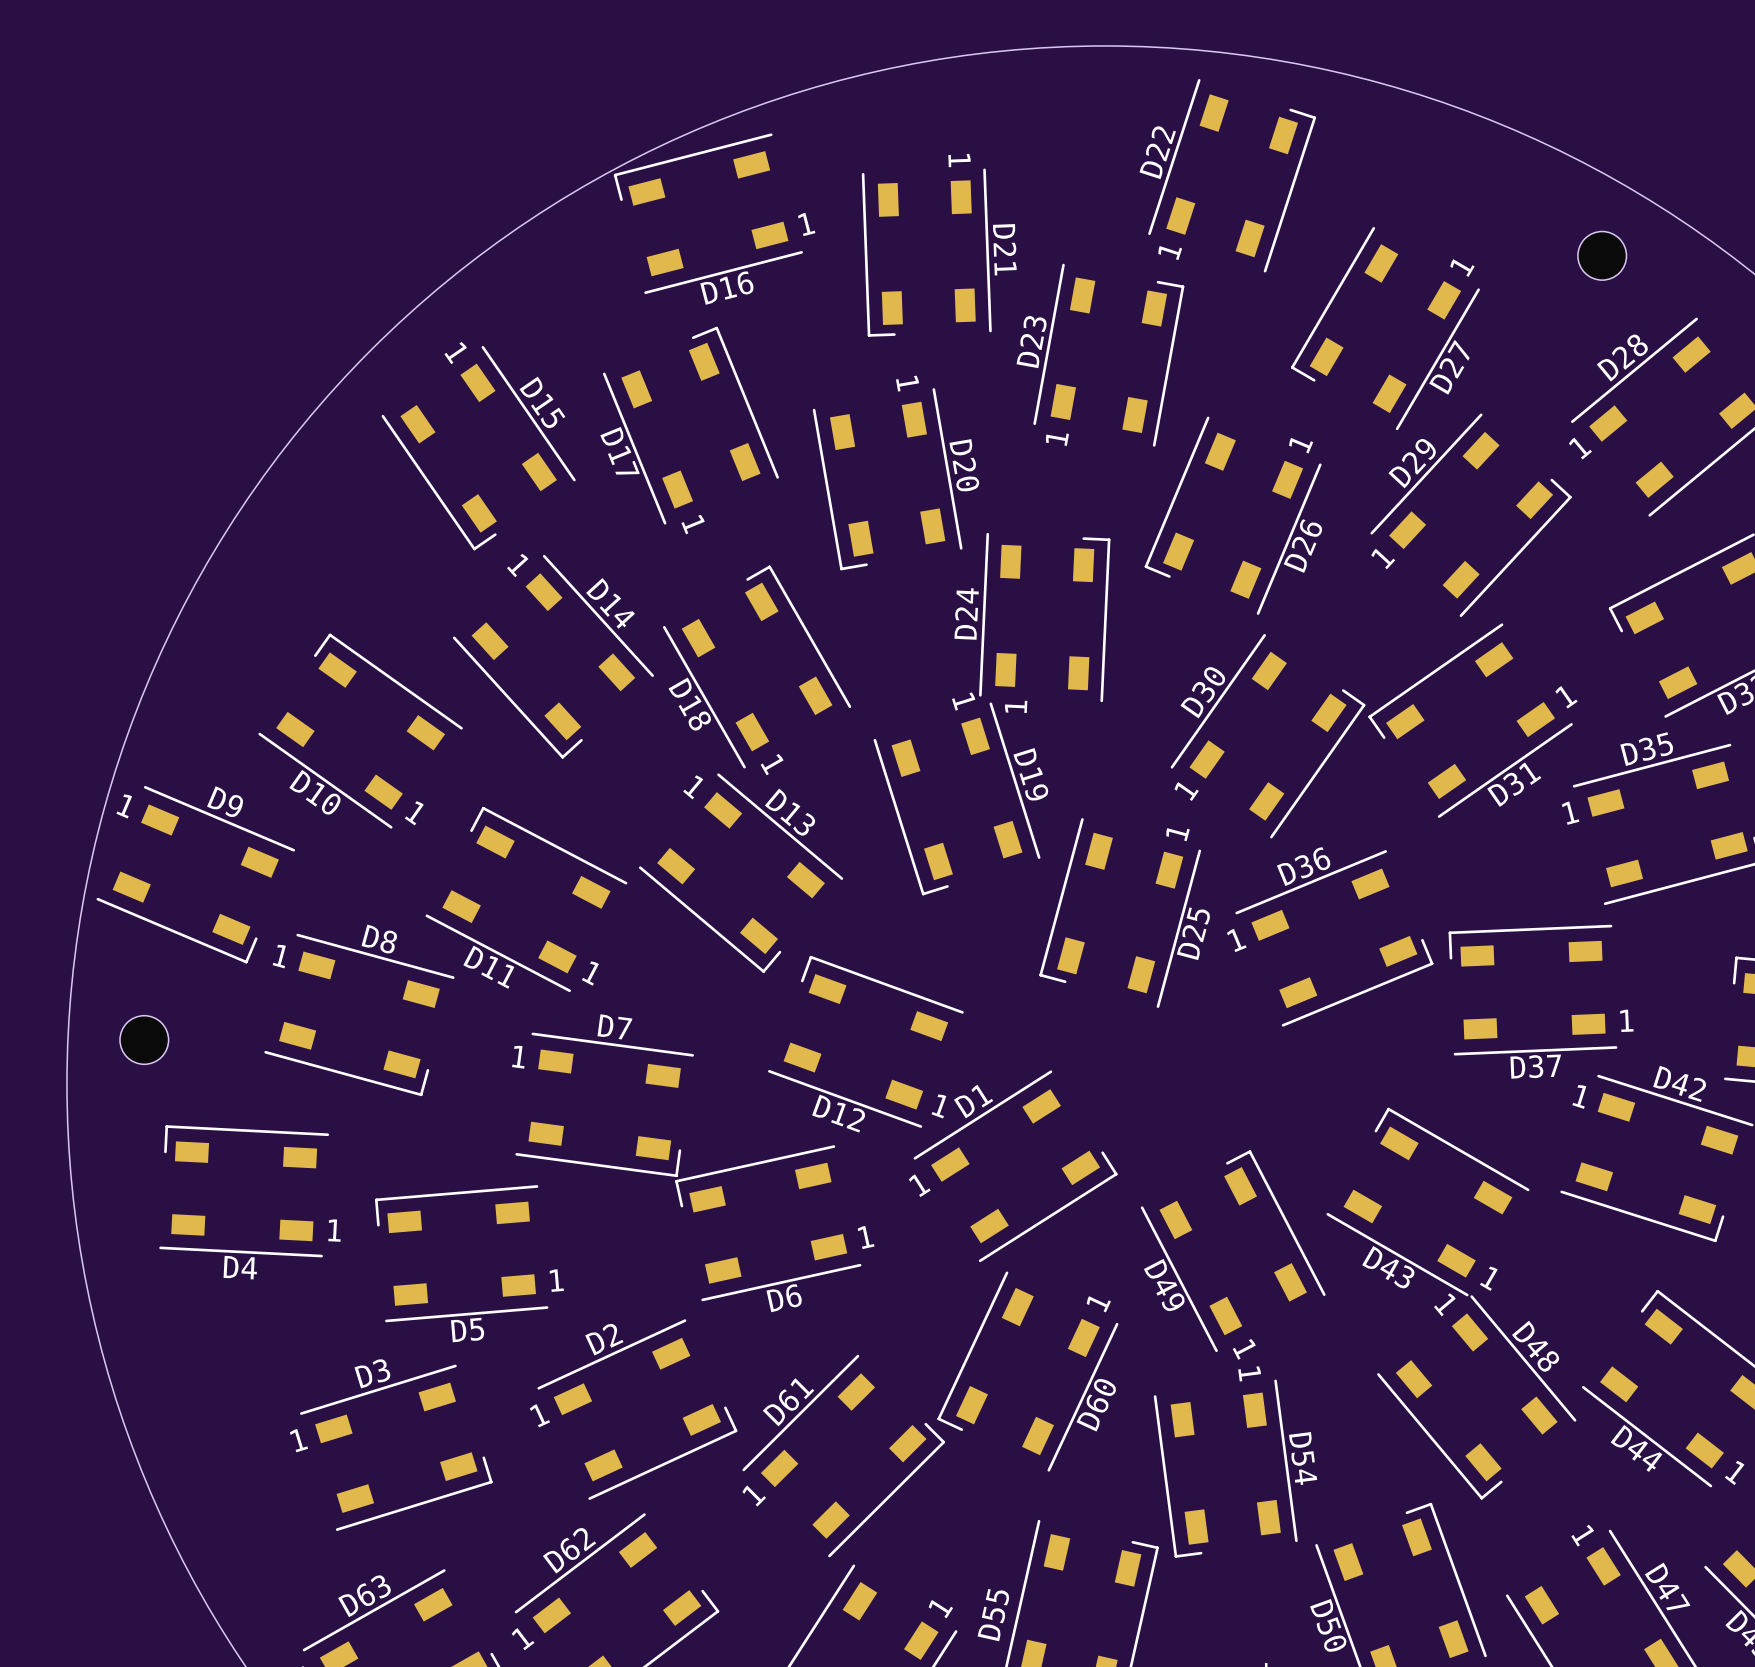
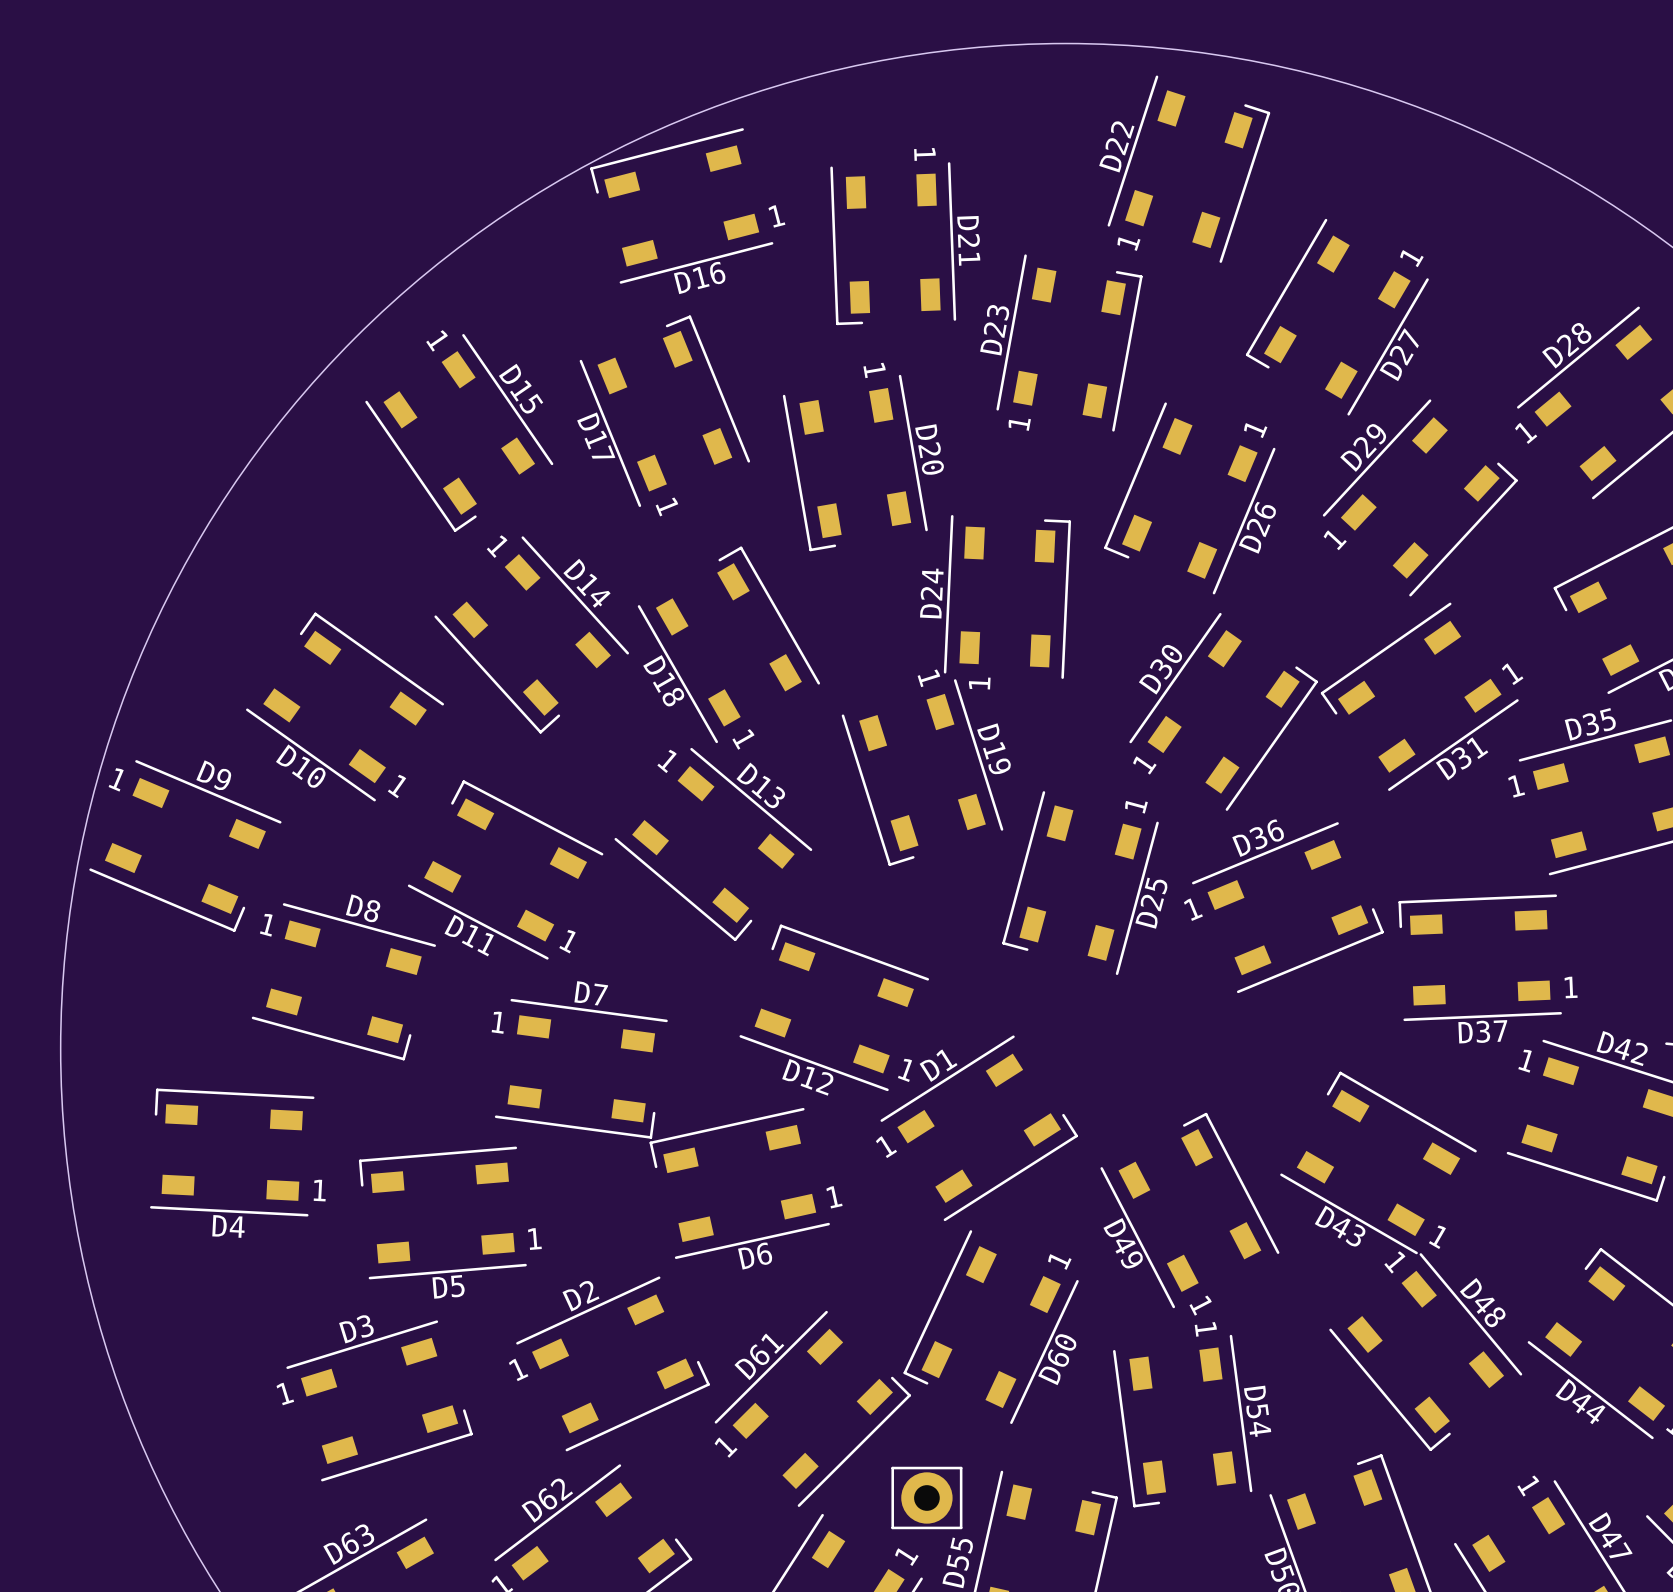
part: (1602, 255) -> none
part: (144, 1040) -> none
part: none -> (926, 1497)

